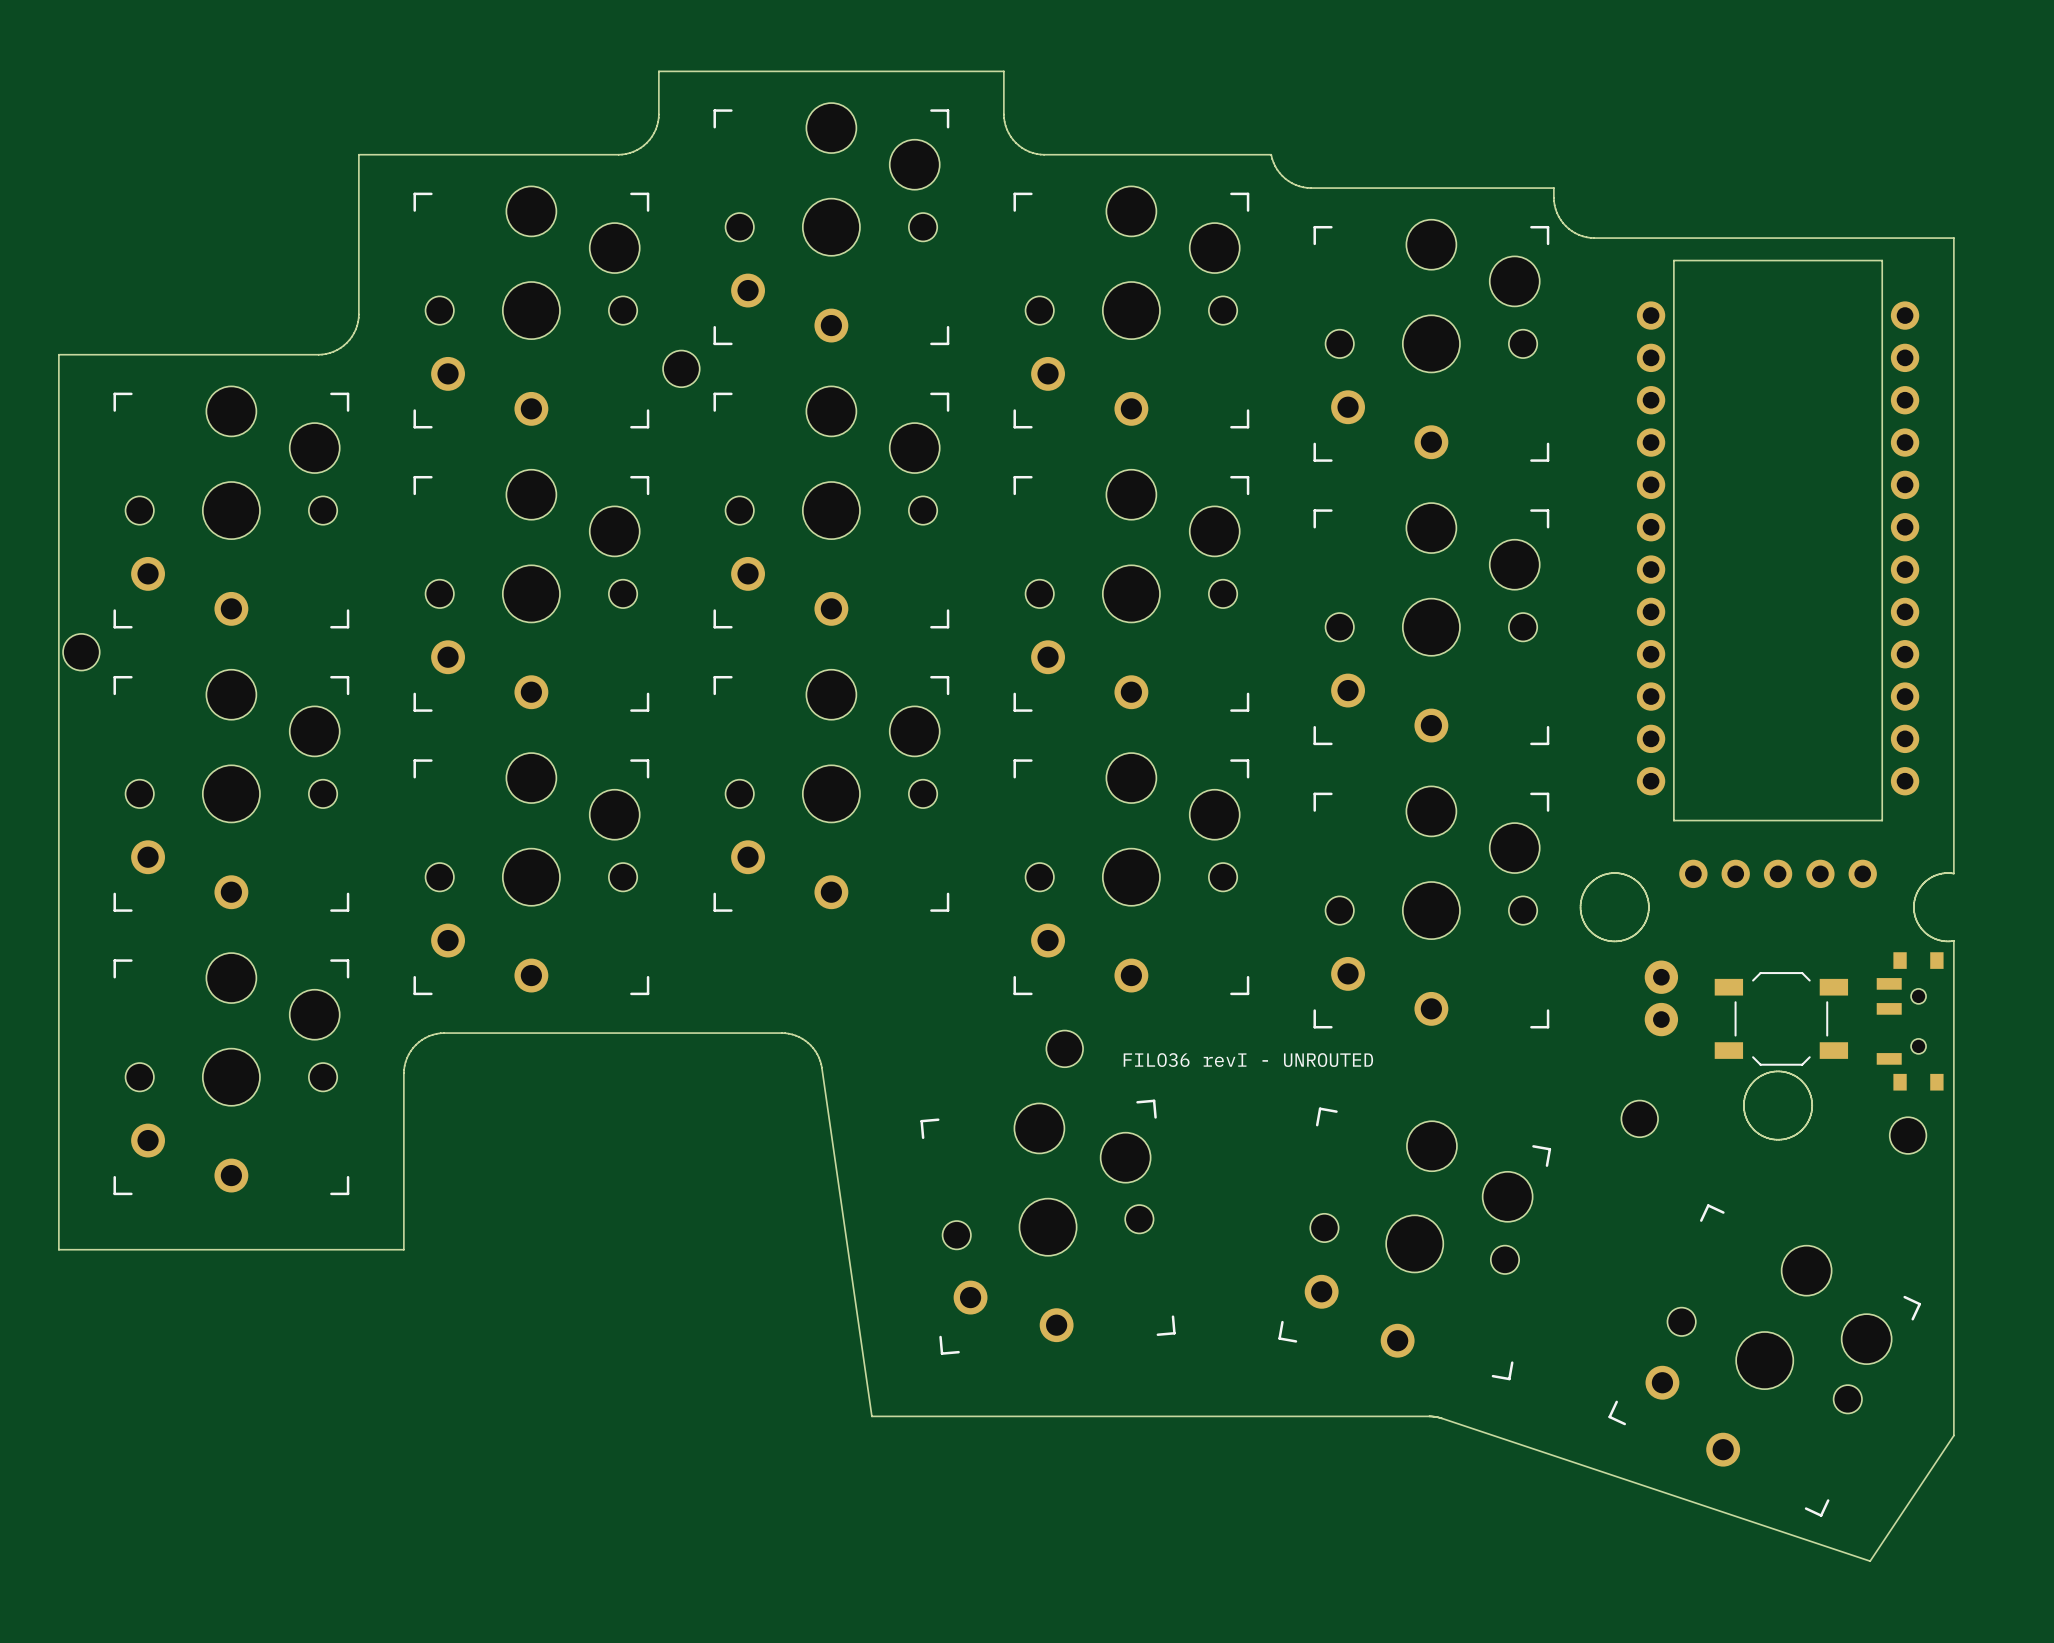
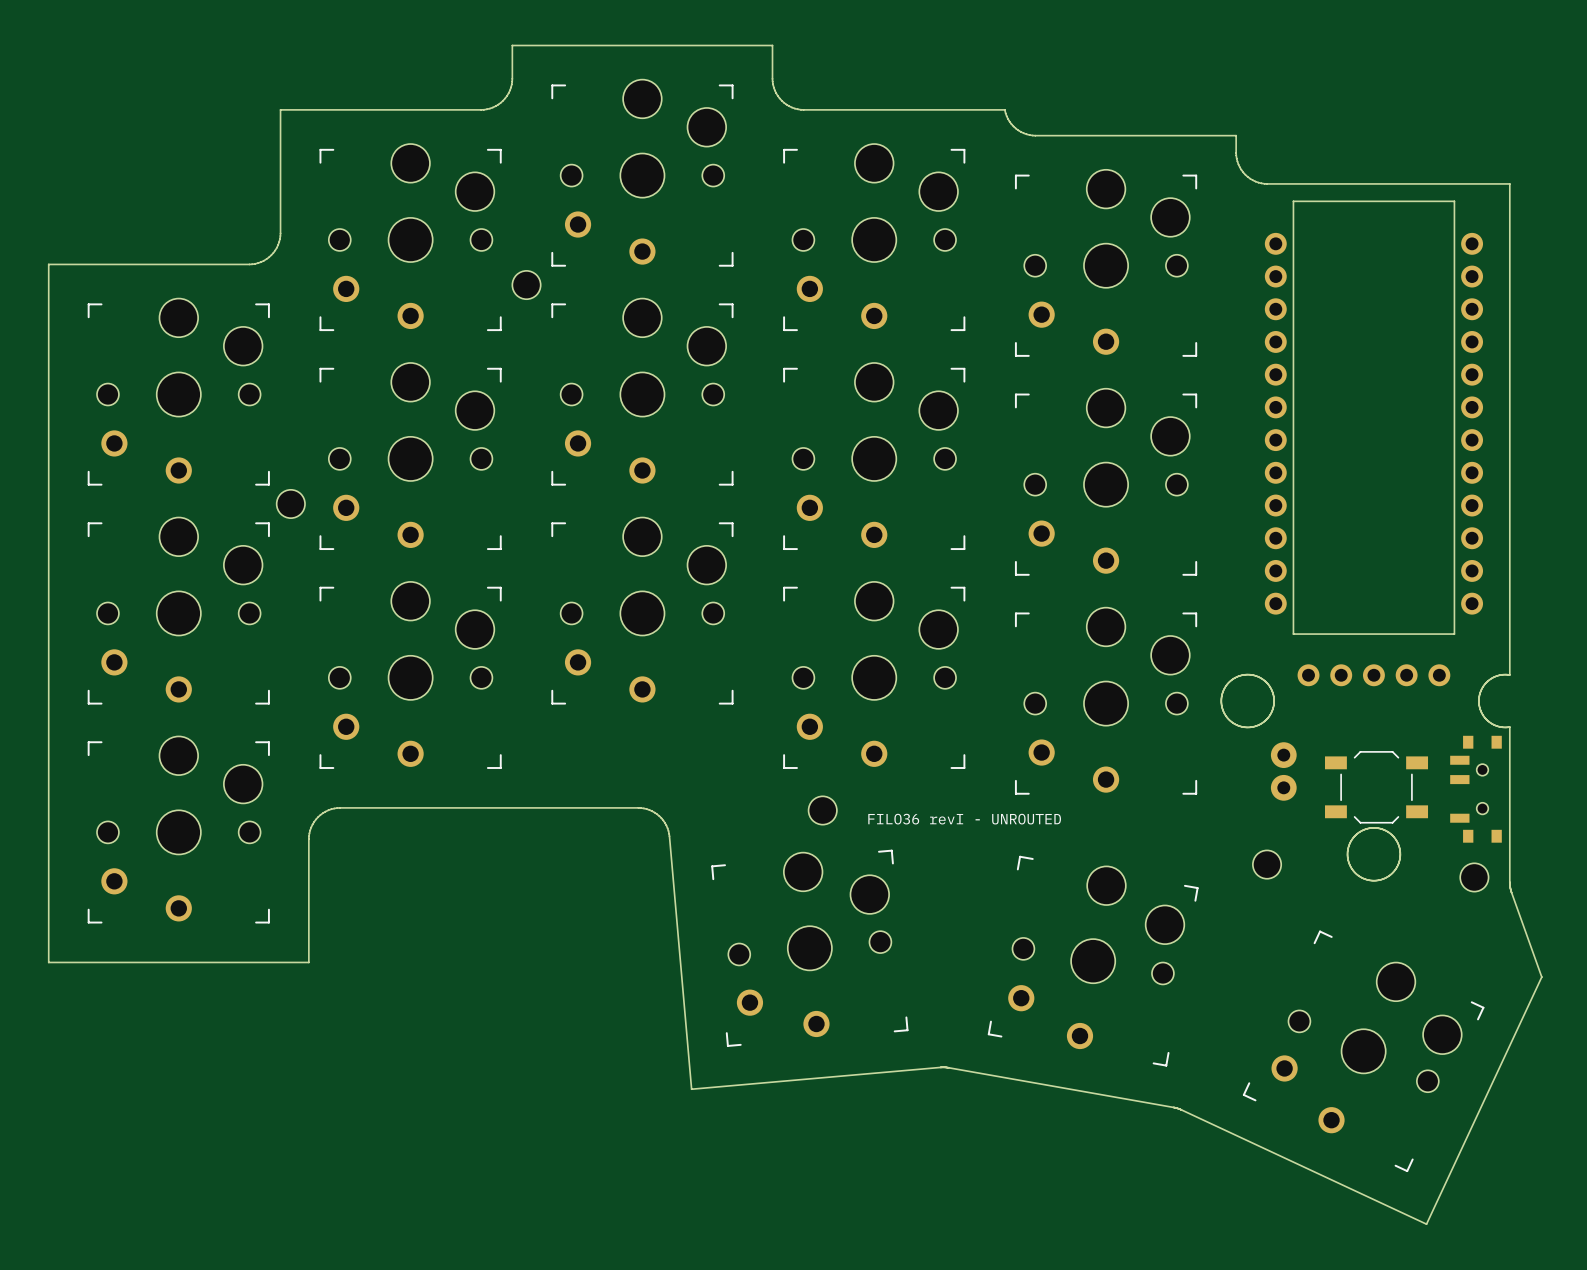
board edge: (1639, 238) (1590, 237) (1575, 233) (1565, 226) (1558, 216) (1554, 205) (1553, 188) (1307, 187) (1292, 183) (1282, 176) (1275, 166) (1271, 154) (1044, 154) (1032, 152) (1015, 142) (1005, 125) (1003, 71) (658, 71) (657, 125) (646, 142) (629, 152) (618, 154) (358, 154) (358, 317) (352, 336) (340, 347) (329, 352) (318, 354) (58, 354) (58, 1249) (403, 1249) (404, 1069) (406, 1058) (413, 1047) (422, 1039) (432, 1034) (444, 1033) (788, 1033) (802, 1038) (810, 1045) (821, 1064) (871, 1416) (1434, 1416) (1870, 1561) (1953, 1435) (1953, 1141) -> (1267, 183) (1252, 180) (1241, 169) (1236, 158) (1236, 135) (1032, 135) (1020, 131) (1013, 126) (1004, 109) (794, 108) (781, 100) (773, 87) (772, 45) (512, 45) (511, 87) (503, 100) (489, 108) (280, 109) (280, 235) (275, 250) (266, 259) (249, 264) (48, 264) (48, 962) (308, 962) (309, 836) (316, 819) (331, 809) (643, 808) (659, 816) (666, 825) (669, 833) (691, 1089) (944, 1067) (1173, 1107) (1426, 1224) (1541, 977) (1511, 892) (1509, 882)
part position: (81, 652) -> (290, 503)

